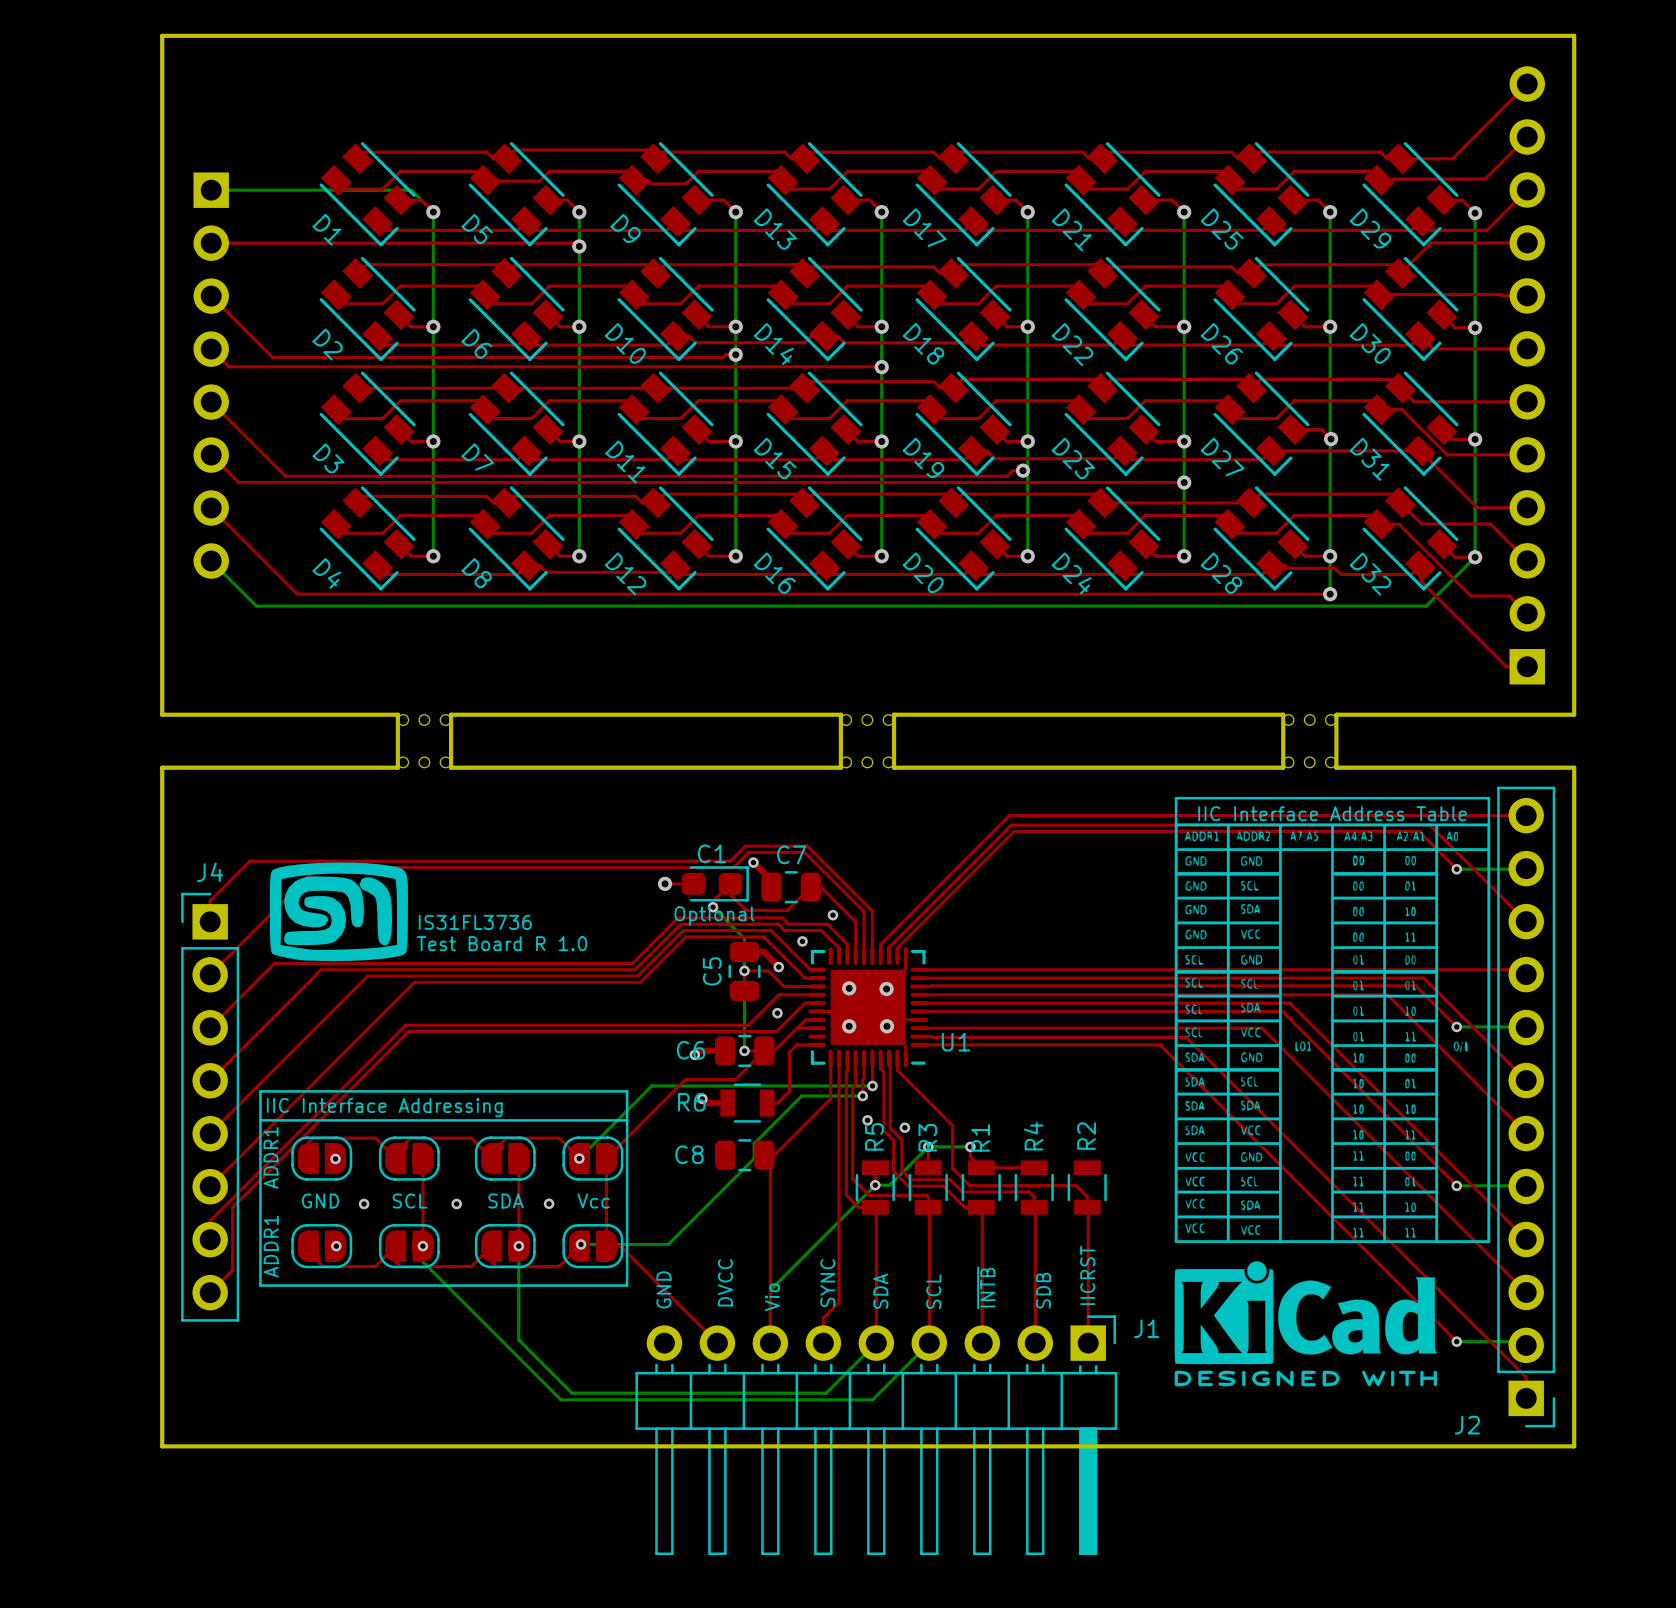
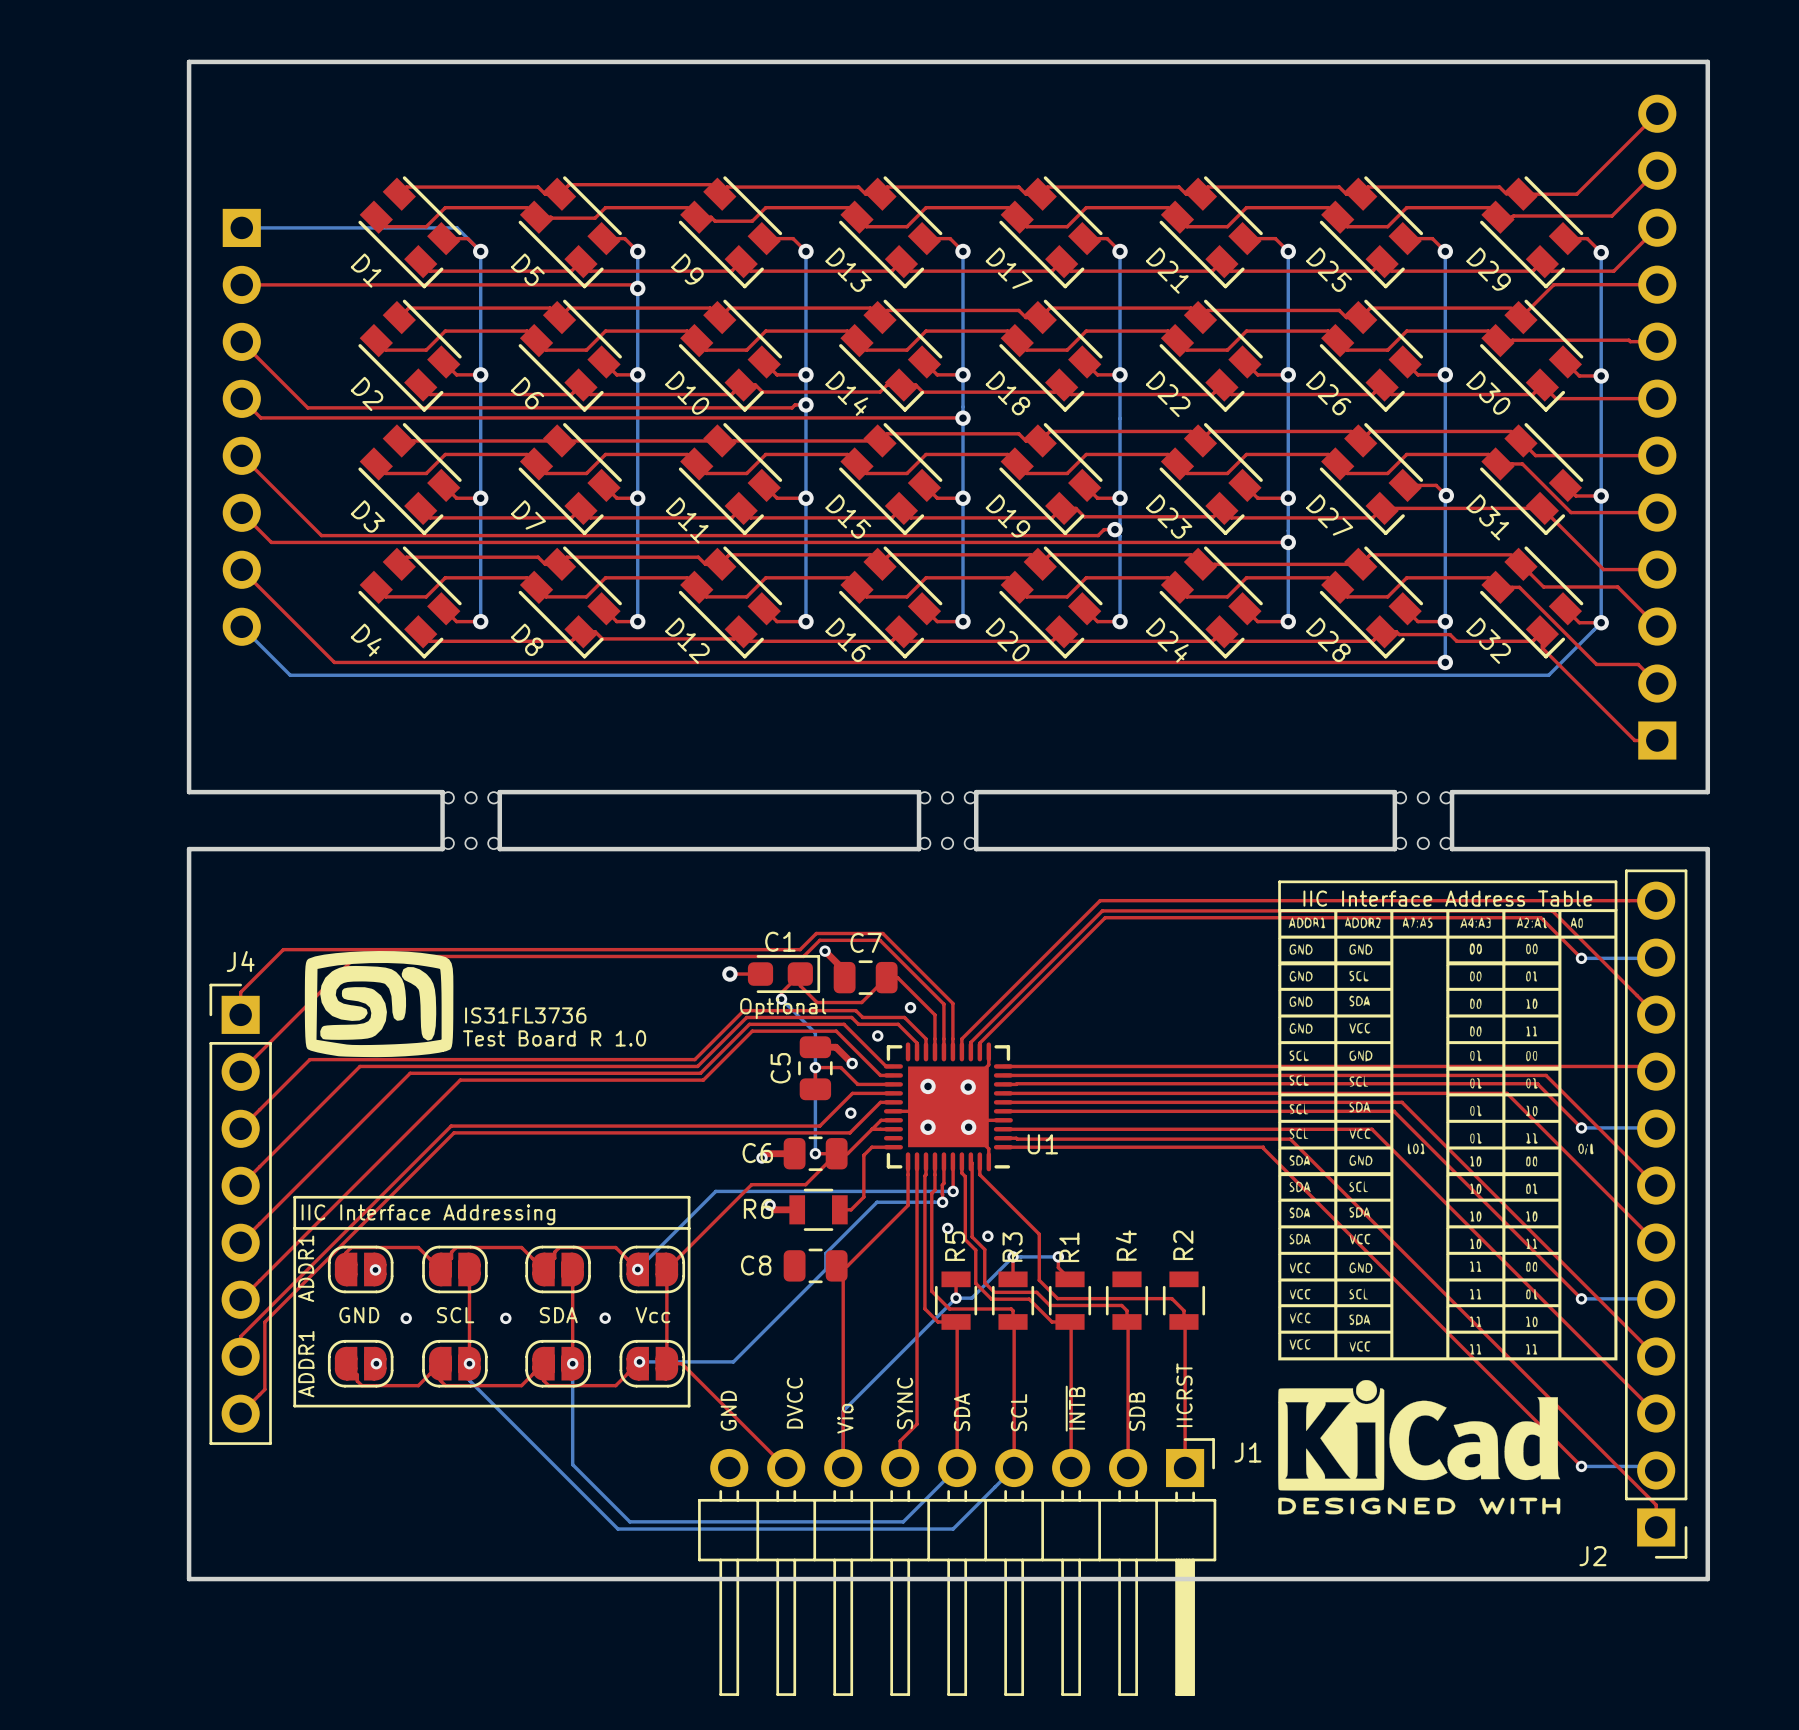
top track: (981, 1167) (1034, 1167) -> none

